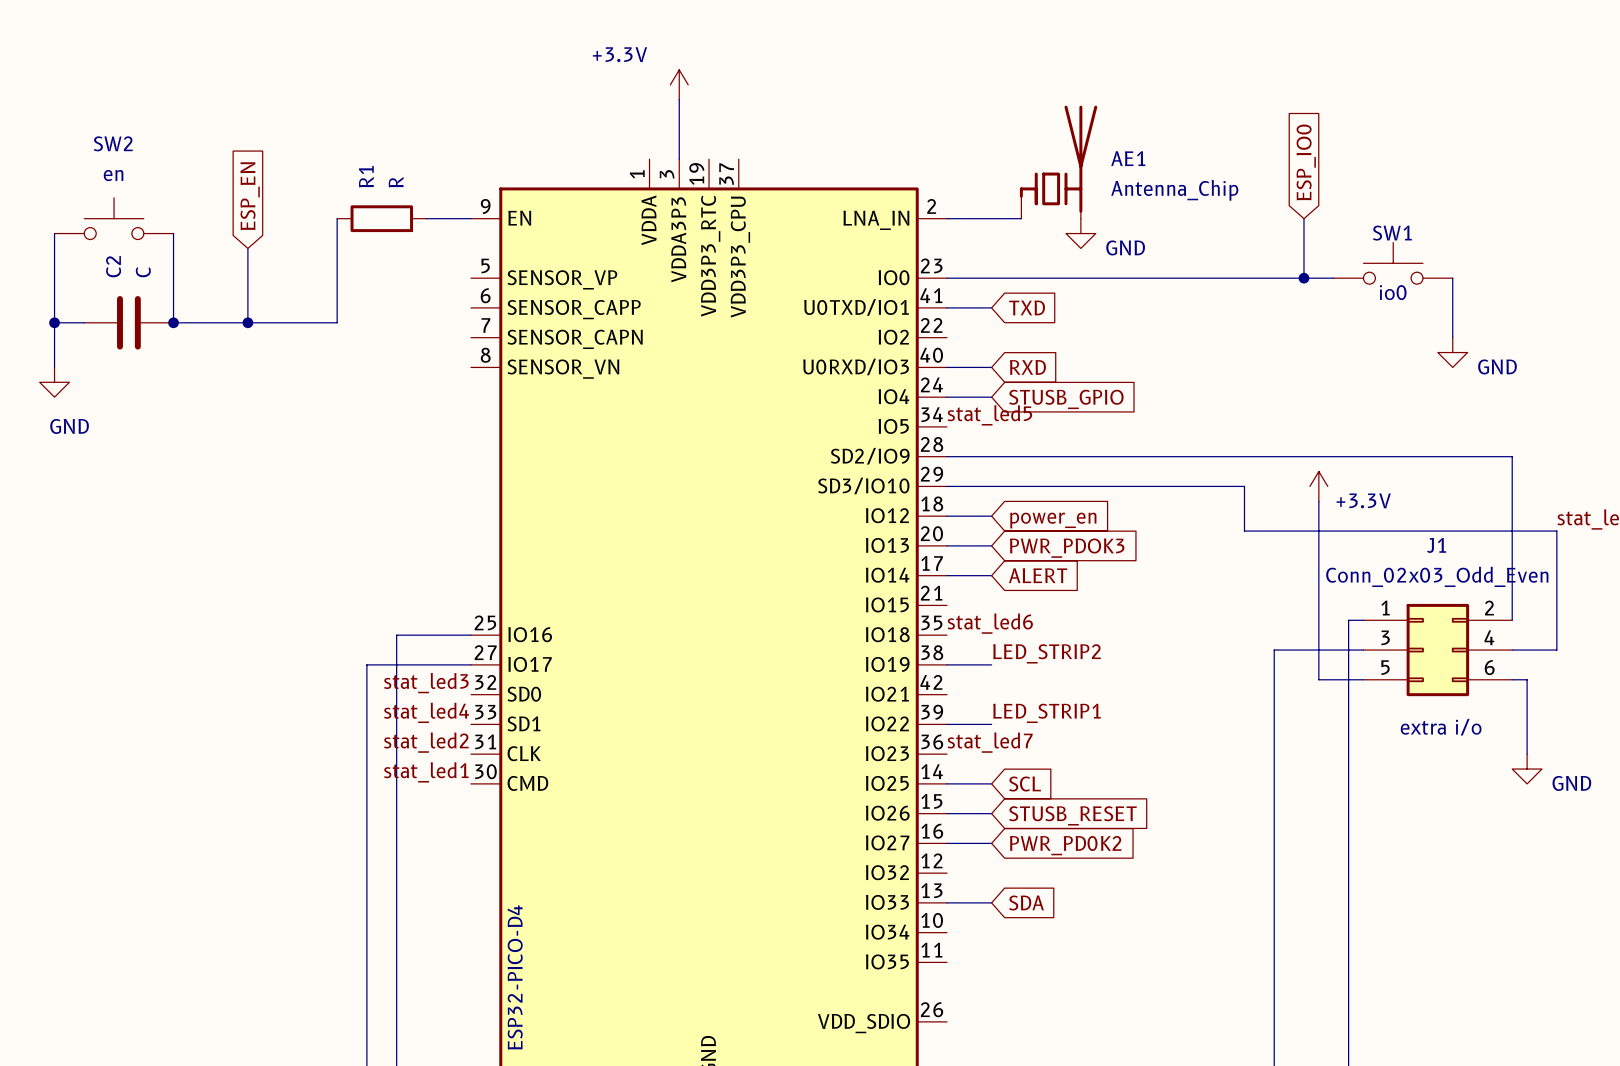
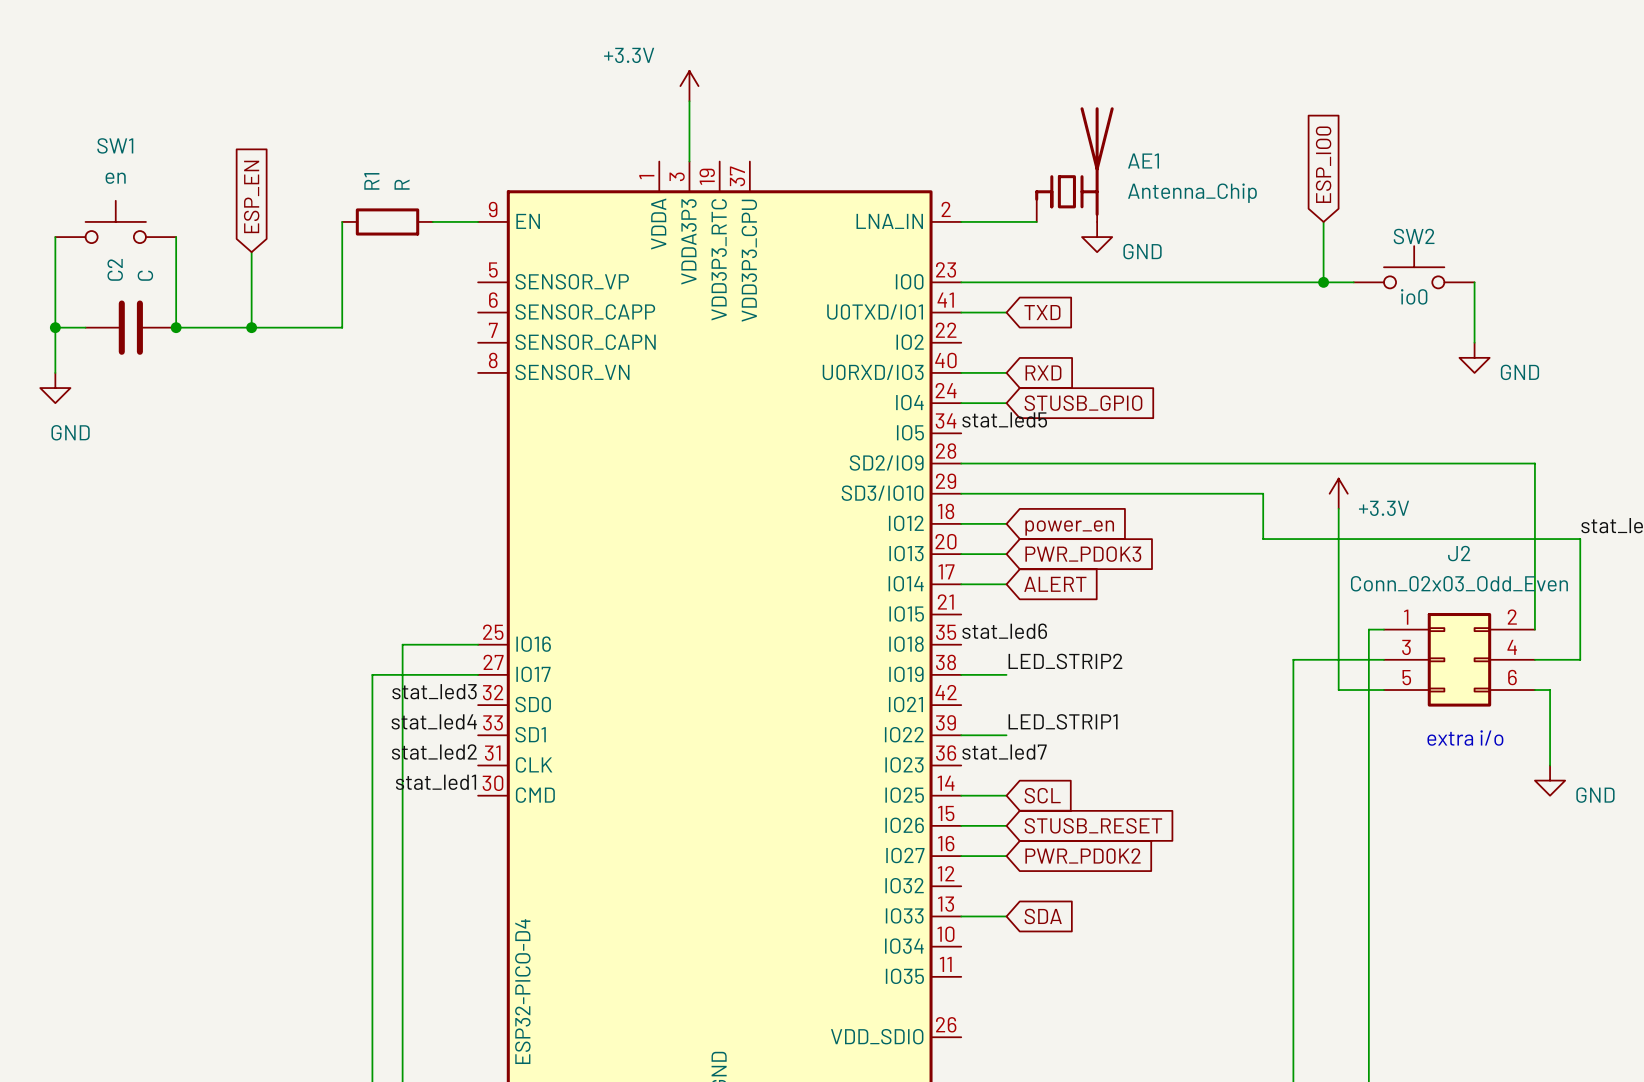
SW2 name: SW2 (113, 143) -> SW1 (115, 145)
SW1 name: SW1 (1392, 233) -> SW2 (1414, 236)
J1 name: J1 (1436, 545) -> J2 (1459, 553)

